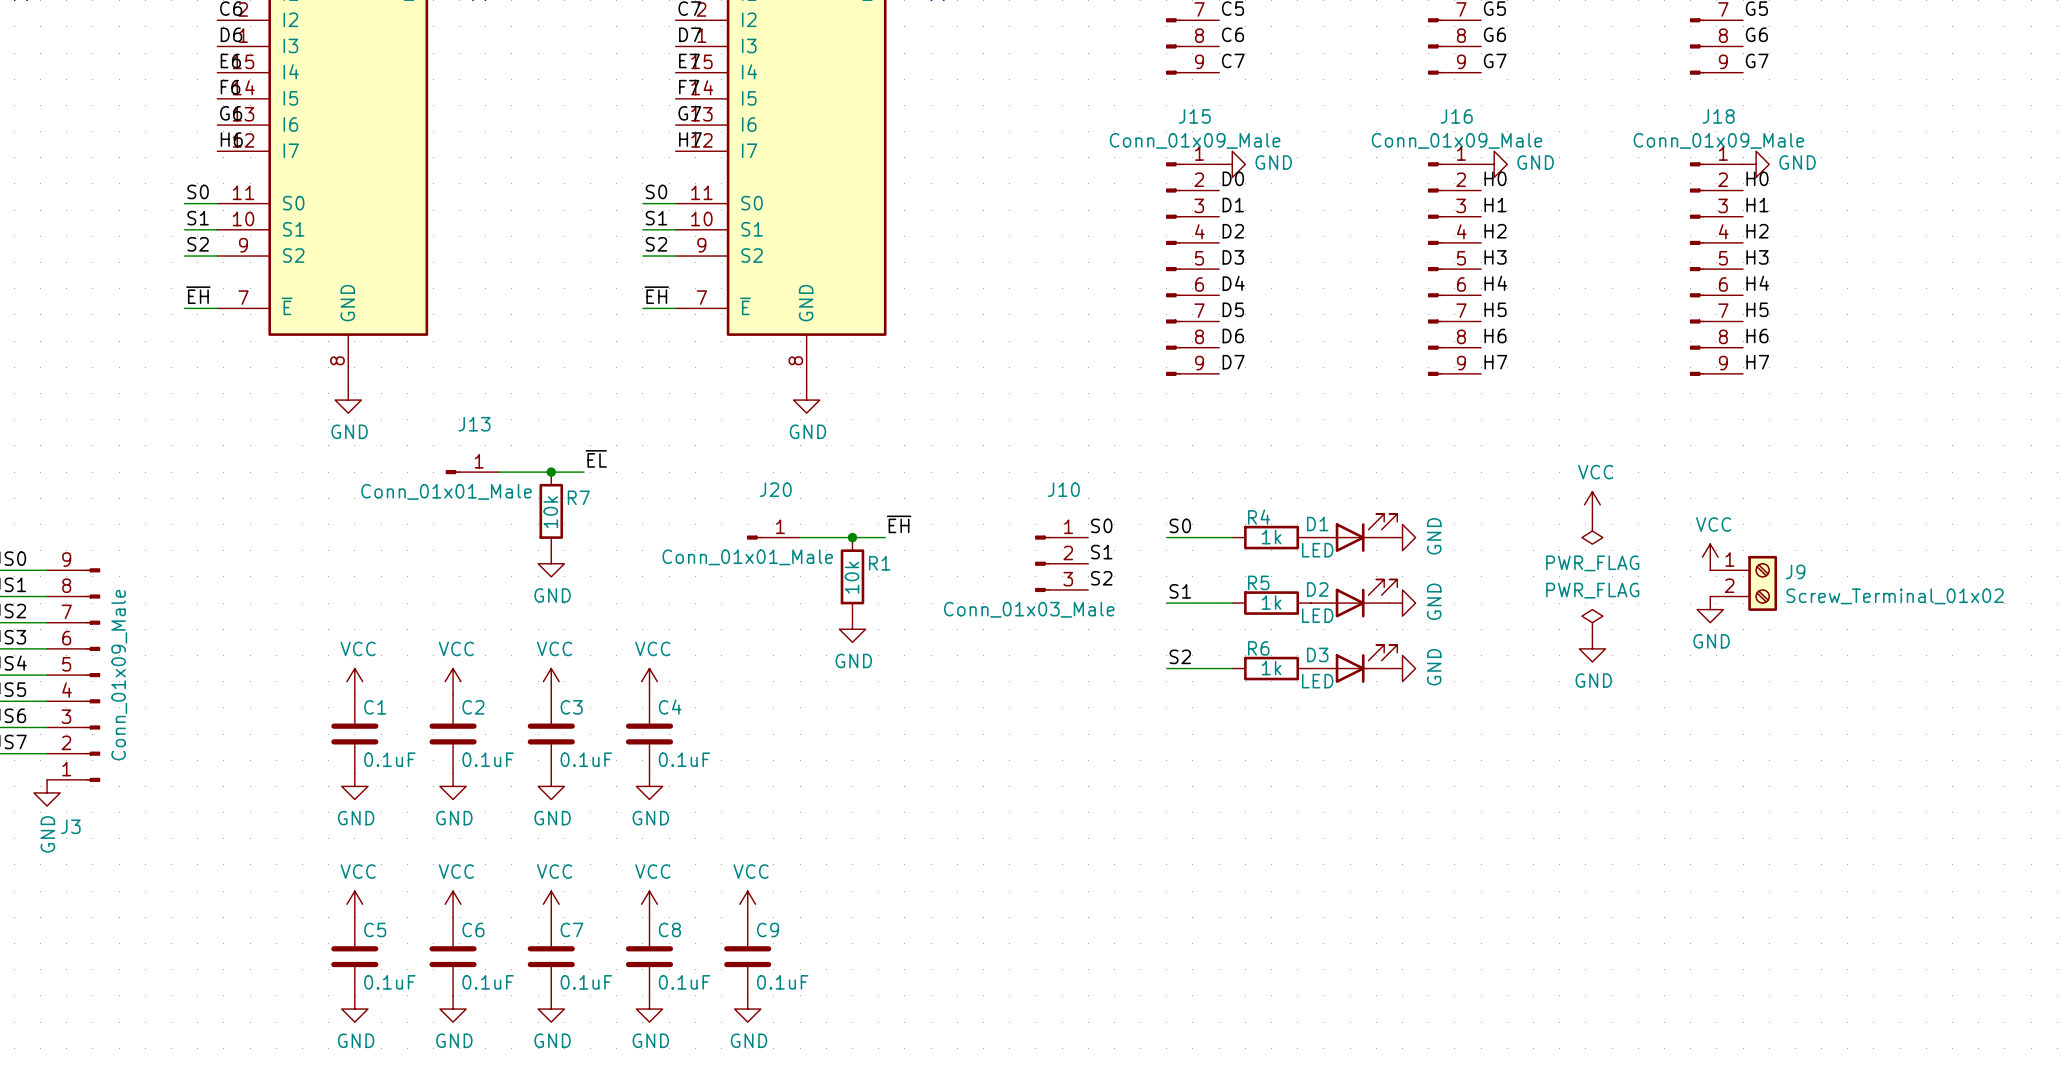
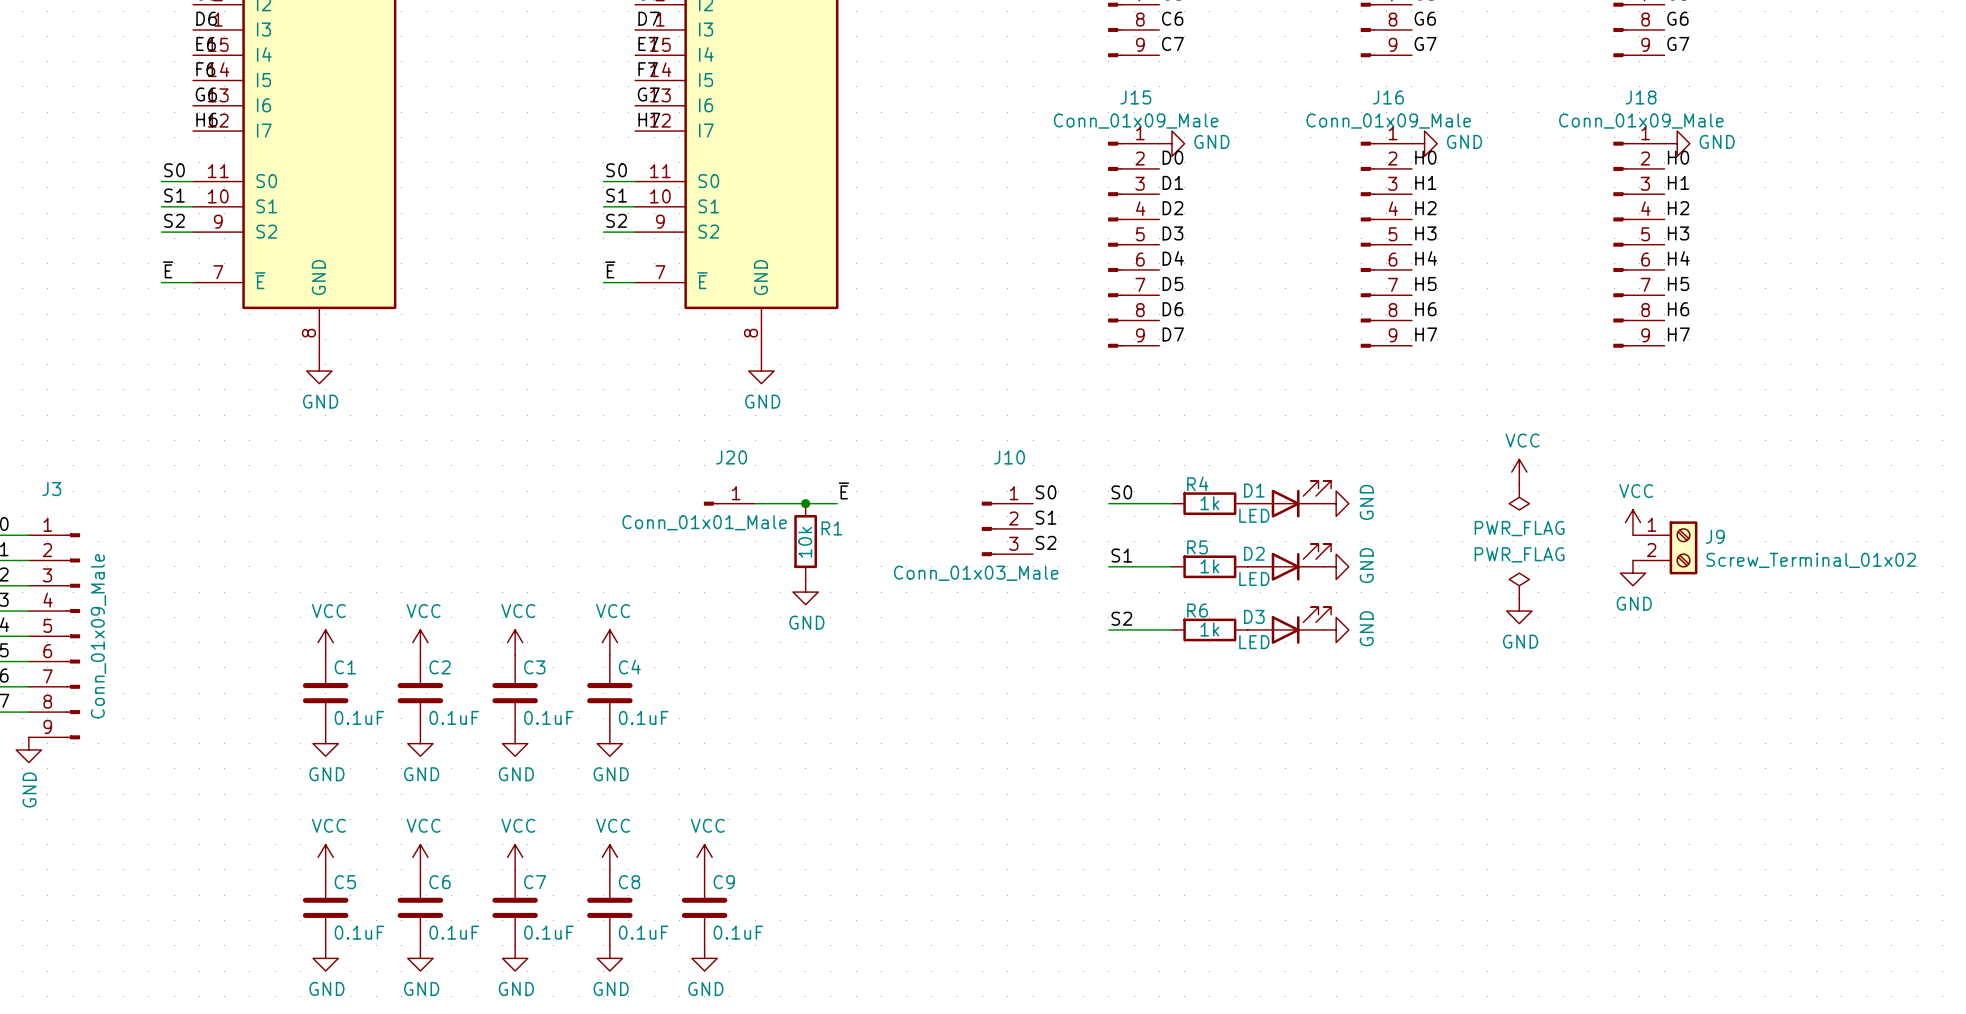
label: ~{EH} (198, 295) -> ~{E} (168, 269)
label: ~{EH} (656, 295) -> ~{E} (610, 269)
label: ~{EL} (596, 458) -> none
J13: Conn_01x01_Male (472, 472) -> none
wire: (498, 472) (584, 472) -> none
junction: (551, 472) -> none
R7: 10k (551, 511) -> none
label: ~{EH} (899, 524) -> ~{E} (843, 490)
power symbol: GND (551, 563) -> none
J3 flip: as is (92, 675) -> up-down (73, 636)

